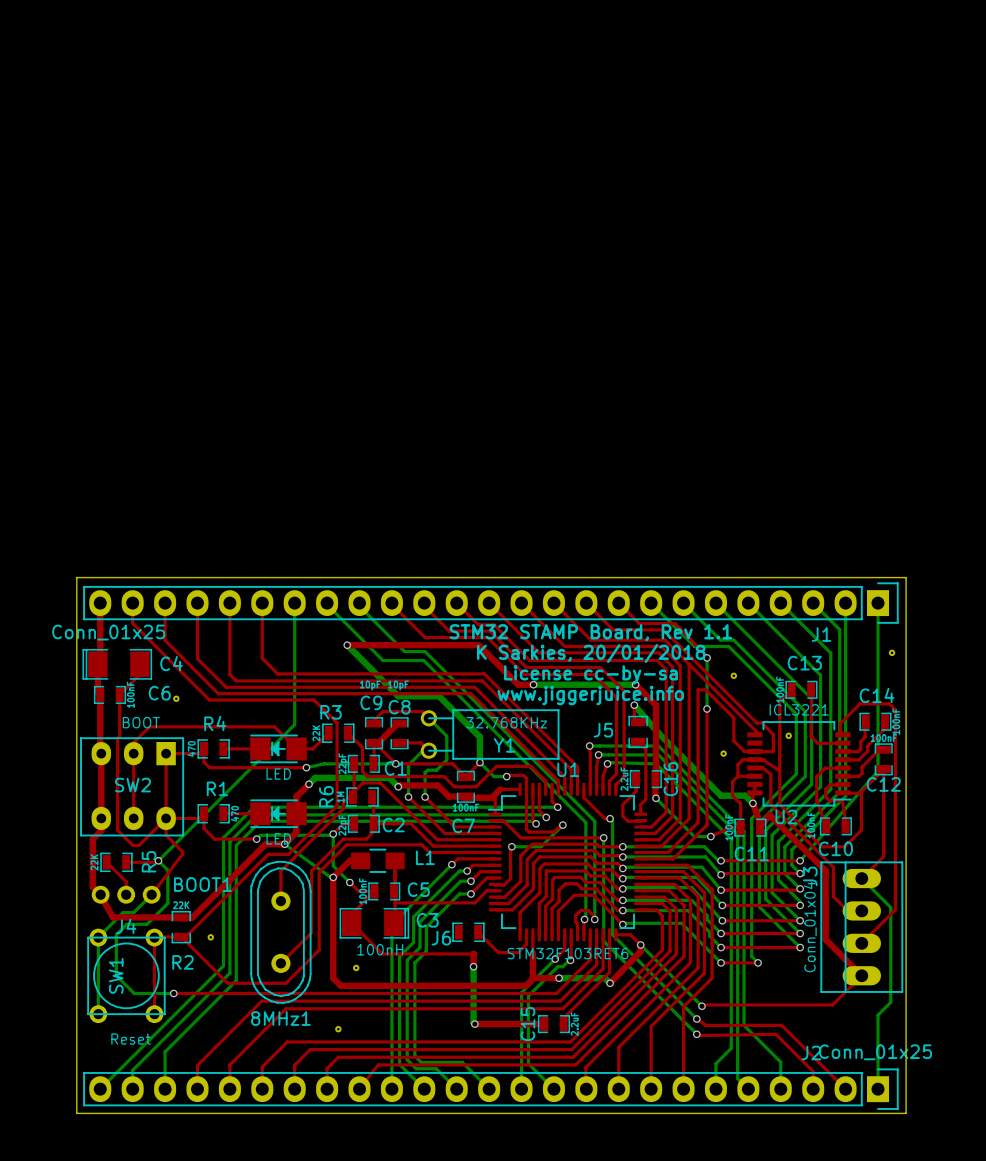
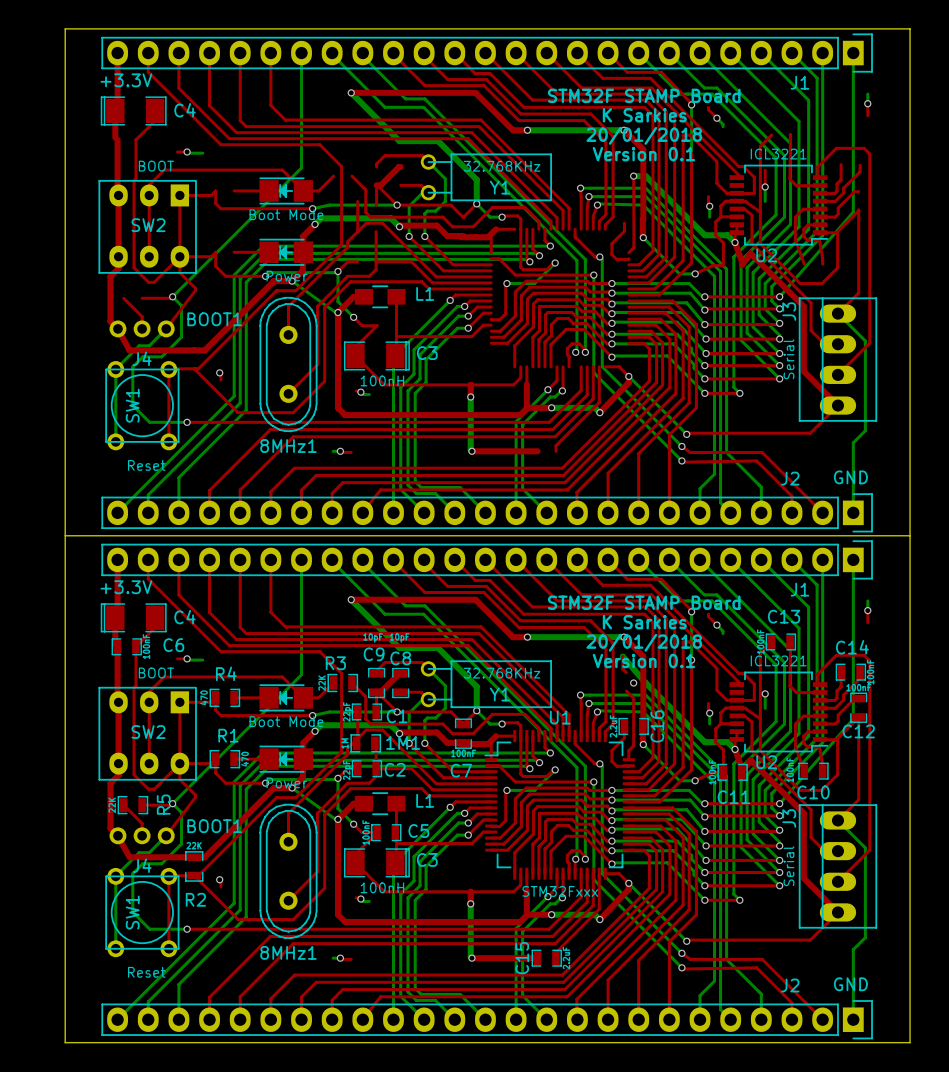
bottom track: none -> (822, 51) (822, 235) (771, 286) (771, 301) (779, 308)
top track: none -> (117, 52) (117, 108) (115, 110) (115, 137) (117, 139) (118, 268) (110, 276) (110, 321) (117, 328) (129, 350) (204, 350) (274, 281) (292, 281) (302, 270) (303, 236) (315, 224)
top track: none -> (178, 52) (178, 88) (229, 138) (468, 138) (550, 221) (550, 229)
top track: none -> (209, 52) (209, 105) (236, 132) (471, 132) (557, 217) (557, 229)
top track: none -> (240, 52) (240, 120) (246, 126) (479, 126) (563, 210) (563, 229)
top track: none -> (270, 52) (270, 105) (286, 120)
bottom track: none -> (301, 52) (301, 167) (172, 296) (181, 305) (181, 337) (161, 356) (142, 356) (132, 366) (132, 405) (149, 422) (187, 422)
top track: none -> (515, 52) (557, 94) (648, 94) (666, 112) (666, 256) (646, 276) (628, 276)
bottom track: none -> (699, 52) (790, 143) (790, 224) (747, 267) (747, 333) (779, 365)
bottom track: none -> (853, 52) (853, 212) (779, 296)
top track: none -> (148, 53) (148, 72) (220, 144) (319, 144) (341, 166) (341, 244) (295, 290) (276, 290) (198, 368) (194, 368)
top track: none -> (454, 53) (475, 73) (490, 73) (523, 107) (644, 107) (652, 115) (652, 250) (639, 264) (628, 264)
top track: none -> (485, 53) (532, 100) (645, 100) (659, 113) (659, 254) (642, 270) (628, 270)
J1: none -> +3.3V (487, 53)
top track: none -> (546, 53) (581, 88) (651, 88) (741, 177)
top track: none -> (577, 53) (602, 78) (650, 78) (738, 166) (743, 166) (754, 177) (753, 193) (737, 193)
top track: none -> (607, 52) (627, 72) (661, 72) (691, 103)
bottom track: none -> (638, 53) (679, 94) (712, 94) (776, 158) (776, 214) (733, 256) (733, 387) (739, 393)
bottom track: none -> (669, 53) (704, 88) (716, 88) (784, 155) (784, 217) (741, 260) (741, 340) (779, 378)
bottom track: none -> (730, 53) (798, 121) (798, 226) (753, 272) (753, 326) (779, 353)
bottom track: none -> (761, 53) (808, 100) (808, 229) (759, 278) (759, 314) (779, 335) (779, 339) (778, 337)
bottom track: none -> (791, 53) (817, 78) (817, 231) (765, 283) (765, 308) (779, 323)
bottom track: none -> (331, 54) (385, 107) (423, 107) (576, 260) (575, 352)
top track: none -> (393, 54) (424, 85) (484, 85) (519, 120) (584, 120) (605, 142) (605, 214) (599, 221) (599, 229)
top track: none -> (422, 54) (447, 79) (486, 79) (520, 113) (590, 113) (613, 136) (613, 217) (605, 225) (605, 229)
bottom track: none -> (362, 55) (405, 98) (424, 98) (585, 259) (585, 352)
top track: none -> (351, 92) (475, 92) (512, 130) (527, 130)
bottom track: none -> (351, 92) (399, 141) (438, 141) (476, 179) (476, 203) (490, 217) (502, 217)
via: none -> (351, 92)
bottom track: none -> (867, 94) (867, 103)
text: none -> STM32F STAMP Board (644, 95)
top track: none -> (867, 103) (867, 115)
via: none -> (867, 103)
bottom track: none -> (691, 104) (691, 153)
via: none -> (691, 104)
top track: none -> (708, 107) (716, 118)
C4: none -> (133, 110)
top track: none -> (155, 110) (155, 120) (135, 139) (134, 267) (148, 282) (154, 282) (179, 256) (211, 256) (215, 252) (215, 266) (225, 276) (265, 276)
top track: none -> (674, 110) (674, 256) (648, 282) (628, 282)
text: none -> K Sarkies (644, 115)
bottom track: none -> (716, 118) (722, 126)
via: none -> (716, 118)
top track: none -> (286, 120) (480, 120) (569, 208) (569, 229)
bottom track: none -> (527, 130) (624, 130)
via: none -> (527, 130)
top track: none -> (624, 130) (643, 149) (643, 237)
via: none -> (624, 130)
text: none -> 20/01/2018 (644, 135)
top track: none -> (771, 135) (760, 146) (760, 243) (800, 283) (821, 283) (837, 267) (837, 232)
top track: none -> (790, 135) (789, 179) (796, 185) (817, 185)
top track: none -> (177, 151) (187, 151)
bottom track: none -> (187, 151) (202, 153)
via: none -> (187, 151)
top track: none -> (691, 153) (691, 263) (659, 295) (628, 295)
text: none -> Version 0.1 (643, 154)
top track: none -> (428, 162) (422, 155) (385, 155) (376, 164) (376, 166)
bottom track: none -> (428, 162) (445, 178) (445, 201) (435, 211) (427, 211) (424, 213) (424, 236)
top track: none -> (841, 164) (841, 179) (837, 183) (837, 191) (834, 193) (817, 193)
top track: none -> (860, 165) (860, 171) (843, 188) (843, 193) (835, 201) (817, 201)
top track: none -> (765, 170) (765, 186)
top track: none -> (333, 176) (318, 190) (303, 190) (282, 170) (164, 170) (149, 185) (149, 256)
top track: none -> (352, 176) (365, 189) (365, 212) (370, 217) (442, 217) (452, 226) (473, 226) (492, 207) (525, 207) (538, 221) (538, 229)
top track: none -> (633, 176) (633, 247) (628, 252)
bottom track: none -> (633, 176) (645, 176) (704, 235) (727, 235) (735, 242)
via: none -> (633, 176)
Y1: none -> 32.768KHz (486, 177)
top track: none -> (817, 177) (817, 166) (836, 148) (864, 148) (869, 153) (869, 343) (837, 374)
top track: none -> (376, 185) (382, 185) (400, 166) (399, 166) (380, 185) (376, 185)
top track: none -> (376, 185) (376, 205)
top track: none -> (377, 185) (397, 205) (450, 205) (463, 217) (476, 203)
top track: none -> (400, 185) (421, 185) (428, 192)
bottom track: none -> (765, 186) (765, 201)
via: none -> (765, 186)
top track: none -> (580, 188) (581, 229)
bottom track: none -> (580, 188) (645, 188) (726, 269) (726, 452) (761, 487) (761, 512)
via: none -> (580, 188)
top track: none -> (234, 190) (269, 190)
part: none -> Boot Mode (286, 190)
top track: none -> (858, 191) (854, 191) (838, 208) (838, 214) (835, 217) (817, 217)
bottom track: none -> (428, 192) (422, 192) (409, 206) (409, 236)
top track: none -> (736, 193) (726, 193) (716, 183) (716, 161) (690, 135) (683, 135) (683, 260) (654, 288) (628, 288)
top track: none -> (589, 196) (587, 229)
bottom track: none -> (589, 196) (645, 196) (720, 271) (720, 502) (730, 512)
via: none -> (589, 196)
top track: none -> (708, 196) (709, 206)
top track: none -> (744, 201) (725, 201) (720, 206) (720, 216)
top track: none -> (357, 201) (357, 231)
top track: none -> (743, 201) (760, 211)
via: none -> (476, 203)
bottom track: none -> (397, 205) (329, 205) (312, 208)
via: none -> (397, 205)
top track: none -> (597, 205) (593, 216) (593, 229)
bottom track: none -> (597, 205) (643, 205) (714, 276) (714, 474) (700, 488) (700, 512)
via: none -> (597, 205)
U2: none -> ICL3221 (778, 205)
bottom track: none -> (709, 206) (709, 217)
via: none -> (709, 206)
top track: none -> (312, 208) (220, 208) (215, 203) (215, 190) (211, 195) (179, 195) (179, 272) (195, 290) (166, 328)
via: none -> (312, 208)
top track: none -> (736, 208) (744, 208) (751, 215) (751, 243) (811, 302) (811, 330) (824, 344) (837, 344)
top track: none -> (817, 209) (803, 209) (795, 217) (795, 239) (804, 264)
top track: none -> (858, 210) (858, 292) (837, 313)
top track: none -> (858, 210) (836, 232) (817, 232)
top track: none -> (502, 217) (517, 215) (520, 218) (520, 267) (523, 269) (546, 269) (555, 263)
via: none -> (502, 217)
top track: none -> (720, 216) (715, 221) (715, 235) (723, 242) (723, 265) (713, 265) (695, 273)
top track: none -> (720, 216) (736, 216)
top track: none -> (624, 223) (624, 231) (611, 243) (611, 254) (616, 259) (628, 258)
bottom track: none -> (315, 224) (321, 218) (391, 218) (399, 226)
via: none -> (315, 224)
top track: none -> (736, 224) (735, 242) (741, 265) (750, 253) (803, 306) (803, 371) (837, 405) (810, 433) (686, 434)
top track: none -> (817, 224) (808, 224) (803, 229) (803, 236) (807, 240) (819, 240) (822, 264)
top track: none -> (399, 226) (436, 225) (447, 236) (463, 236)
via: none -> (399, 226)
SW2: none -> BOOT (147, 226)
top track: none -> (496, 229) (514, 229)
top track: none -> (496, 229) (491, 234) (491, 252)
top track: none -> (496, 229) (488, 237) (461, 237)
top track: none -> (526, 229) (526, 258) (529, 261)
top track: none -> (532, 229) (532, 249) (539, 255)
top track: none -> (544, 229) (544, 240) (550, 246)
top track: none -> (575, 229) (575, 237) (595, 256) (599, 256)
top track: none -> (376, 231) (376, 269) (369, 276) (347, 276) (317, 306) (317, 364) (288, 393)
top track: none -> (409, 236) (443, 270) (491, 270)
via: none -> (409, 236)
top track: none -> (424, 236) (453, 264) (491, 264)
via: none -> (424, 236)
bottom track: none -> (643, 237) (679, 273) (695, 273)
via: none -> (643, 237)
via: none -> (735, 242)
via: none -> (550, 246)
bottom track: none -> (551, 246) (263, 246) (234, 275) (234, 396) (117, 512)
top track: none -> (234, 252) (269, 252)
part: none -> Power (286, 252)
bottom track: none -> (539, 255) (537, 253) (265, 253) (240, 278) (240, 403) (148, 494) (148, 512)
via: none -> (539, 255)
bottom track: none -> (599, 256) (602, 259) (602, 366) (681, 446)
via: none -> (599, 256)
top track: none -> (491, 258) (499, 258) (515, 275) (593, 275)
top track: none -> (357, 261) (347, 261) (337, 271)
top track: none -> (376, 261) (411, 261) (432, 282) (491, 282)
bottom track: none -> (529, 261) (527, 259) (269, 259) (246, 282) (246, 410) (178, 477) (178, 512)
via: none -> (529, 261)
bottom track: none -> (555, 263) (534, 283) (506, 283)
via: none -> (555, 263)
via: none -> (337, 271)
via: none -> (695, 273)
bottom track: none -> (593, 275) (593, 372) (681, 460)
via: none -> (593, 275)
bottom track: none -> (265, 276) (269, 272) (337, 271) (337, 301) (353, 317)
via: none -> (265, 276)
top track: none -> (491, 276) (436, 276) (382, 223) (366, 223) (347, 241) (347, 247) (288, 306) (288, 334)
bottom track: none -> (292, 281) (337, 312)
via: none -> (292, 281)
top track: none -> (506, 283) (505, 313) (499, 319) (491, 319)
via: none -> (506, 283)
top track: none -> (611, 283) (589, 283) (587, 281) (526, 281) (515, 291) (515, 316) (500, 331) (491, 331)
bottom track: none -> (611, 283) (689, 283) (702, 296) (704, 296)
via: none -> (611, 283)
top track: none -> (491, 288) (429, 288) (421, 281) (350, 281) (324, 307) (324, 381) (293, 412) (238, 412) (194, 368)
top track: none -> (611, 293) (590, 291) (585, 287) (529, 287) (521, 295) (521, 319) (503, 337) (491, 337)
bottom track: none -> (611, 293) (690, 293) (704, 310)
via: none -> (611, 293)
top track: none -> (491, 295) (455, 295) (450, 300)
top track: none -> (172, 296) (142, 298)
via: none -> (172, 296)
top track: none -> (363, 296) (353, 296) (337, 312) (337, 407) (345, 415) (520, 415) (526, 407)
L1: none -> 100nH (380, 296)
top track: none -> (396, 296) (395, 355)
top track: none -> (704, 296) (779, 296)
via: none -> (704, 296)
via: none -> (779, 296)
top track: none -> (123, 298) (142, 316) (142, 328)
bottom track: none -> (450, 300) (393, 357) (393, 512)
via: none -> (450, 300)
top track: none -> (491, 301) (470, 301) (464, 306)
top track: none -> (628, 301) (672, 301) (696, 324) (696, 407) (669, 434) (669, 512)
top track: none -> (611, 304) (607, 299) (587, 299) (581, 293) (533, 293) (527, 299) (527, 323) (507, 343) (491, 343)
bottom track: none -> (611, 304) (686, 302) (704, 324)
via: none -> (611, 304)
bottom track: none -> (464, 306) (457, 306) (414, 349) (414, 374) (400, 387) (400, 489) (424, 512)
via: none -> (464, 306)
top track: none -> (491, 307) (477, 307) (468, 316)
top track: none -> (628, 307) (669, 307) (689, 326) (689, 403) (638, 453) (638, 512)
top track: none -> (779, 308) (704, 310)
via: none -> (779, 308)
via: none -> (704, 310)
via: none -> (337, 312)
top track: none -> (491, 313) (483, 313) (468, 328)
top track: none -> (611, 313) (601, 305) (584, 305) (578, 299) (537, 299) (533, 304) (533, 326) (514, 345) (514, 366)
bottom track: none -> (611, 313) (681, 312) (706, 339)
via: none -> (611, 313)
top track: none -> (628, 313) (665, 313) (683, 330) (683, 398) (608, 473) (608, 512)
bottom track: none -> (837, 313) (865, 340) (865, 430) (853, 442) (853, 512)
bottom track: none -> (468, 316) (458, 316) (420, 354) (420, 378) (407, 390) (407, 485) (416, 493) (435, 493) (454, 512)
via: none -> (468, 316)
top track: none -> (353, 317) (362, 325) (377, 325) (355, 347) (355, 355) (384, 384) (513, 384) (520, 377) (520, 366)
via: none -> (353, 317)
top track: none -> (628, 319) (660, 319) (675, 334) (675, 393) (576, 492) (577, 512)
top track: none -> (611, 323) (607, 323) (595, 311) (581, 311) (576, 306) (539, 306) (539, 330) (532, 337) (532, 366)
bottom track: none -> (611, 323) (677, 322) (706, 353)
via: none -> (611, 323)
top track: none -> (779, 323) (780, 324) (704, 324)
via: none -> (779, 323)
top track: none -> (491, 325) (483, 325) (471, 336) (396, 336)
top track: none -> (628, 325) (655, 325) (669, 339) (669, 387) (567, 489) (380, 489) (362, 512)
via: none -> (704, 324)
J4: none -> BOOT1 (142, 328)
bottom track: none -> (468, 328) (457, 328) (426, 359) (426, 382) (415, 393) (415, 481) (421, 487) (460, 487) (485, 512)
via: none -> (468, 328)
bottom track: none -> (166, 329) (149, 345) (139, 345) (115, 369) (115, 441)
top track: none -> (628, 331) (651, 331) (662, 342) (662, 384) (564, 482) (342, 482) (332, 493) (332, 512)
top track: none -> (611, 334) (607, 334) (590, 317) (576, 317) (572, 312) (547, 312) (545, 314) (545, 333) (538, 339) (538, 366)
bottom track: none -> (611, 334) (677, 334) (704, 365)
via: none -> (611, 334)
top track: none -> (628, 337) (649, 337) (656, 344) (656, 382) (563, 475) (316, 475) (301, 490) (301, 512)
top track: none -> (706, 339) (779, 339)
via: none -> (706, 339)
via: none -> (779, 339)
top track: none -> (611, 343) (607, 343) (586, 323) (573, 323) (568, 318) (557, 318) (551, 324) (551, 335) (544, 342) (544, 366)
bottom track: none -> (611, 343) (673, 343) (694, 364) (694, 368) (704, 378)
via: none -> (611, 343)
top track: none -> (628, 343) (643, 343) (649, 348) (649, 381) (562, 468) (294, 468) (270, 491) (270, 512)
via: none -> (575, 352)
top track: none -> (585, 352) (579, 343) (572, 343) (567, 348) (569, 366)
via: none -> (585, 352)
top track: none -> (706, 353) (779, 353)
via: none -> (706, 353)
via: none -> (779, 353)
C3: none -> (376, 355)
top track: none -> (611, 357) (584, 329) (566, 329) (550, 344) (550, 366)
bottom track: none -> (611, 357) (667, 355) (704, 393)
via: none -> (611, 357)
J3: none -> Serial (837, 359)
8MHz1: none -> (288, 364)
top track: none -> (704, 365) (780, 365)
via: none -> (704, 365)
via: none -> (779, 365)
top track: none -> (526, 366) (526, 407)
top track: none -> (557, 366) (557, 380) (547, 389)
top track: none -> (563, 366) (562, 390)
top track: none -> (581, 366) (581, 390) (549, 422) (187, 422)
top track: none -> (587, 366) (587, 395) (552, 429) (270, 429) (209, 490) (209, 512)
top track: none -> (593, 366) (593, 398) (555, 436) (293, 436) (240, 489) (240, 512)
top track: none -> (599, 366) (599, 402) (555, 445) (555, 451)
top track: none -> (605, 366) (619, 366) (628, 376) (628, 382) (599, 412)
top track: none -> (194, 368) (168, 369) (168, 441)
top track: none -> (219, 372) (220, 380)
via: none -> (219, 372)
bottom track: none -> (628, 376) (686, 434)
via: none -> (628, 376)
top track: none -> (704, 378) (779, 378)
via: none -> (704, 378)
via: none -> (779, 378)
top track: none -> (470, 384) (470, 396)
bottom track: none -> (547, 389) (516, 421) (516, 512)
via: none -> (547, 389)
top track: none -> (356, 390) (360, 392)
bottom track: none -> (562, 390) (555, 396) (550, 396) (522, 424) (522, 488) (546, 512)
via: none -> (562, 390)
bottom track: none -> (360, 392) (363, 394) (369, 394)
via: none -> (360, 392)
top track: none -> (704, 393) (739, 393)
via: none -> (704, 393)
via: none -> (739, 393)
bottom track: none -> (470, 396) (471, 451)
via: none -> (470, 396)
SW1: none -> Reset (142, 405)
top track: none -> (526, 407) (551, 407)
bottom track: none -> (551, 407) (595, 407) (599, 412)
via: none -> (551, 407)
via: none -> (599, 412)
via: none -> (187, 422)
via: none -> (686, 434)
top track: none -> (681, 446) (690, 452) (762, 452) (822, 512)
via: none -> (681, 446)
bottom track: none -> (333, 451) (340, 451)
top track: none -> (340, 451) (351, 452)
via: none -> (340, 451)
top track: none -> (471, 451) (537, 451)
via: none -> (471, 451)
top track: none -> (681, 460) (756, 460) (791, 496) (791, 512)
via: none -> (681, 460)
J2: none -> GND (487, 512)
board edge: (76, 577) (76, 1113) -> (95, 535) (65, 535)
board edge: (906, 577) (906, 1113) -> (879, 535) (910, 535)
J1 value: Conn_01x25 (108, 632) -> +3.3V (126, 587)
text: STM32 STAMP Board, Rev 1.1 (590, 632) -> STM32F STAMP Board (644, 602)
bottom track: none -> (867, 600) (867, 610)
part: (892, 652) -> none
text: K Sarkies, 20/01/2018 (591, 653) -> none
top track: none -> (867, 610) (867, 622)
via: none -> (867, 610)
top track: none -> (708, 614) (716, 625)
text: none -> K Sarkies (644, 622)
bottom track: none -> (716, 625) (722, 633)
via: none -> (716, 625)
text: License cc-by-sa (590, 674) -> none
part: (733, 675) -> none
text: none -> 20/01/2018 (644, 642)
text: www.jiggerjuice.info (590, 695) -> none
part: (176, 698) -> none
via position: (634, 705) -> (633, 683)
top track: none -> (177, 658) (187, 658)
bottom track: none -> (187, 658) (202, 660)
via: none -> (187, 658)
text: none -> Version 0.1 (643, 661)
J5: (638, 731) -> none
part: (788, 735) -> none
bottom track: none -> (765, 693) (765, 708)
via: none -> (765, 693)
part: (723, 753) -> none
top track: none -> (708, 703) (709, 713)
bottom track: none -> (709, 713) (709, 724)
via: none -> (709, 713)
part value: LED (278, 774) -> Boot Mode (286, 721)
R6 name: R6 (326, 796) -> 1M1 (403, 742)
part value: LED (278, 838) -> Power (286, 782)
J3 value: Conn_01x04 (810, 926) -> Serial (788, 866)
J6: (468, 932) -> none
top track: (478, 932) (498, 952) (518, 952) (526, 944) -> (470, 891) (513, 891) (520, 882)
part: (210, 937) -> none
top track: none -> (219, 879) (220, 886)
via: none -> (219, 879)
U1 value: STM32F103RET6 (567, 953) -> STM32Fxxx (560, 891)
top track: none -> (356, 897) (360, 899)
bottom track: none -> (360, 899) (363, 901) (369, 901)
via: none -> (360, 899)
part: (356, 967) -> none
bottom track: none -> (333, 958) (340, 958)
top track: none -> (340, 958) (351, 959)
via: none -> (340, 958)
part: (338, 1029) -> none
J2 value: Conn_01x25 (875, 1052) -> GND (850, 984)
board edge: none -> (95, 1042) (65, 1042) (65, 28) (910, 28) (910, 1042) (879, 1042)

